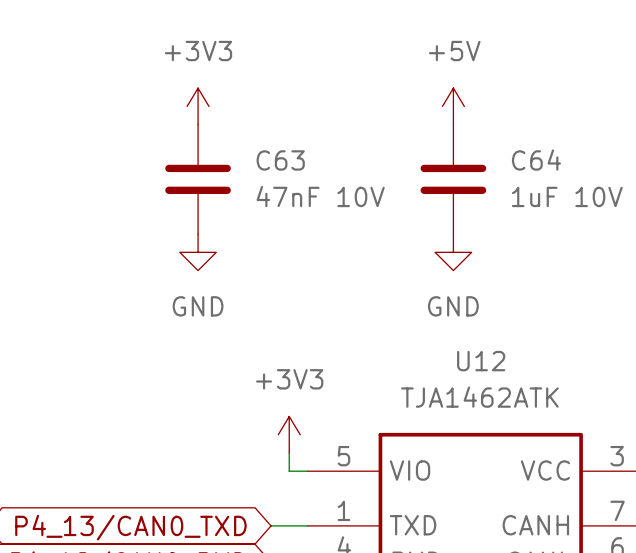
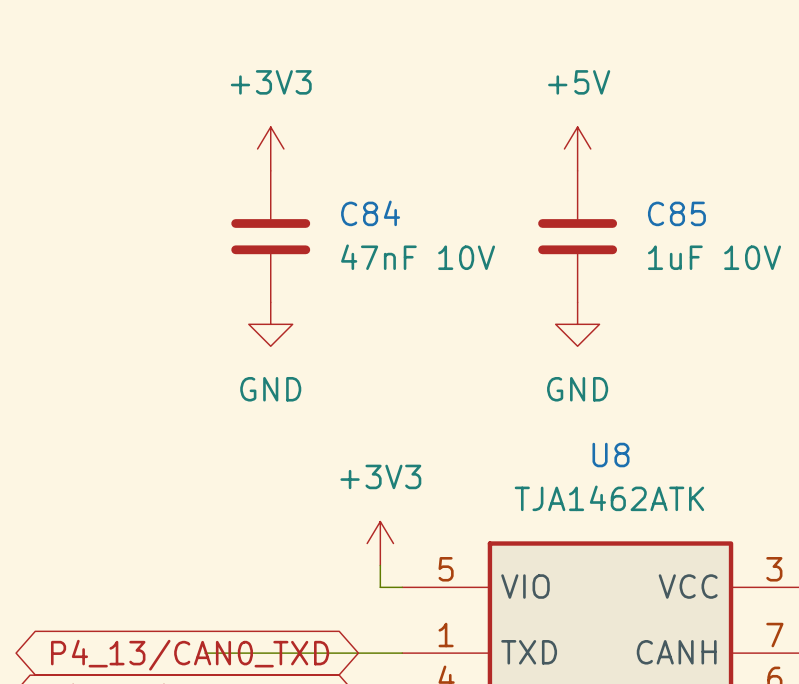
C63 name: C63 (280, 160) -> C84 (370, 213)
C64 name: C64 (536, 160) -> C85 (676, 213)
U12 name: U12 (481, 361) -> U8 (611, 455)
wire: none -> (204, 653) (358, 653)

